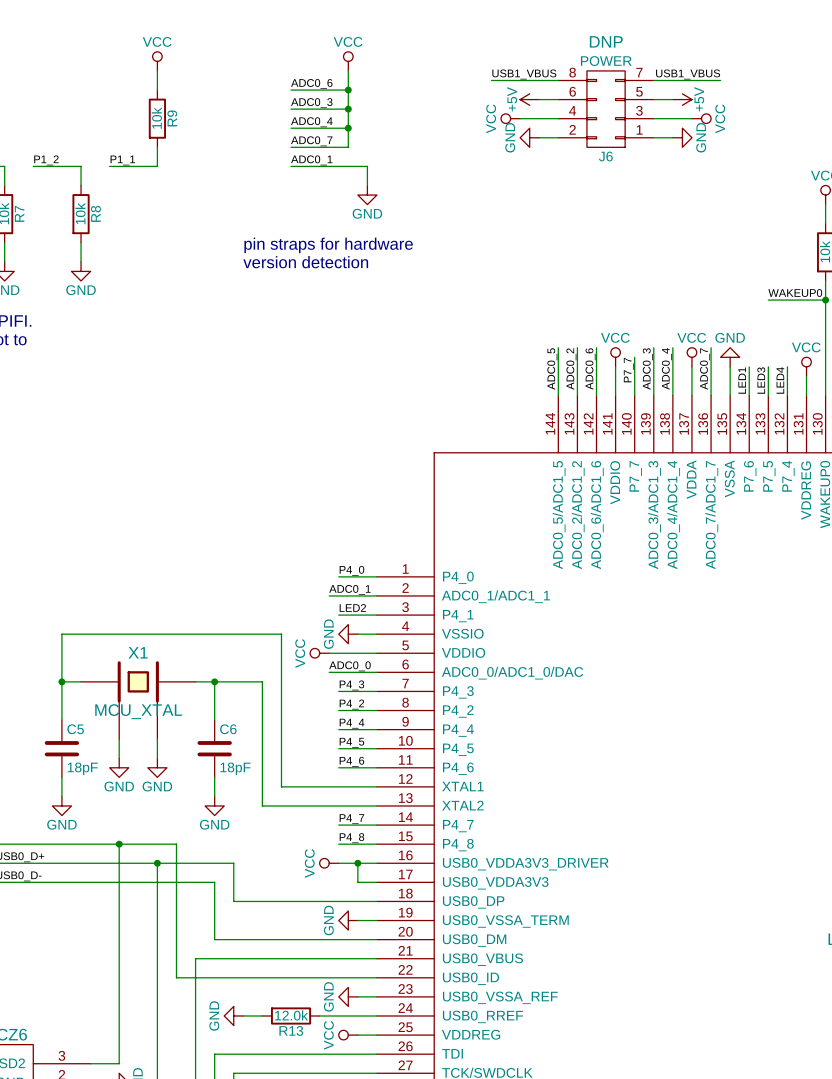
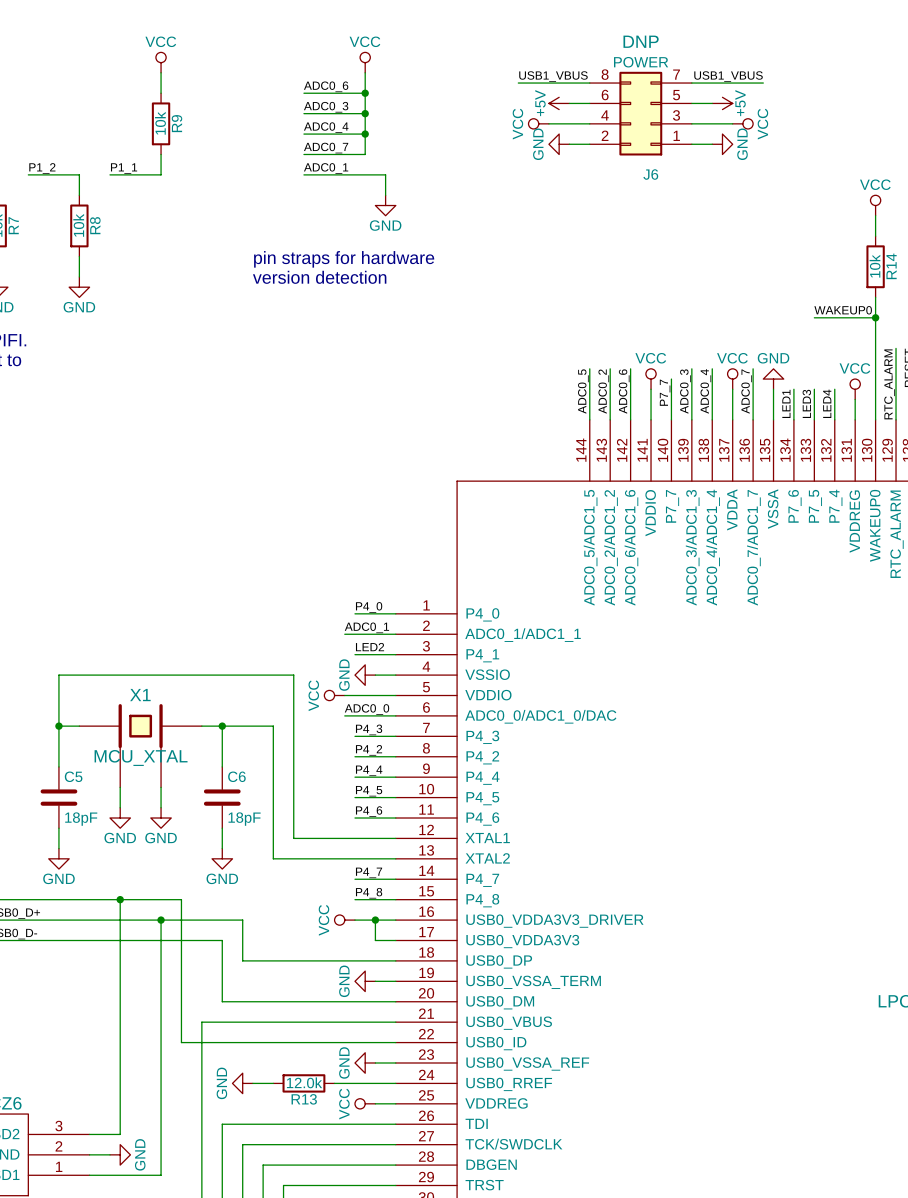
J6 symbol: [558, 70, 654, 148] -> [589, 71, 692, 156]

